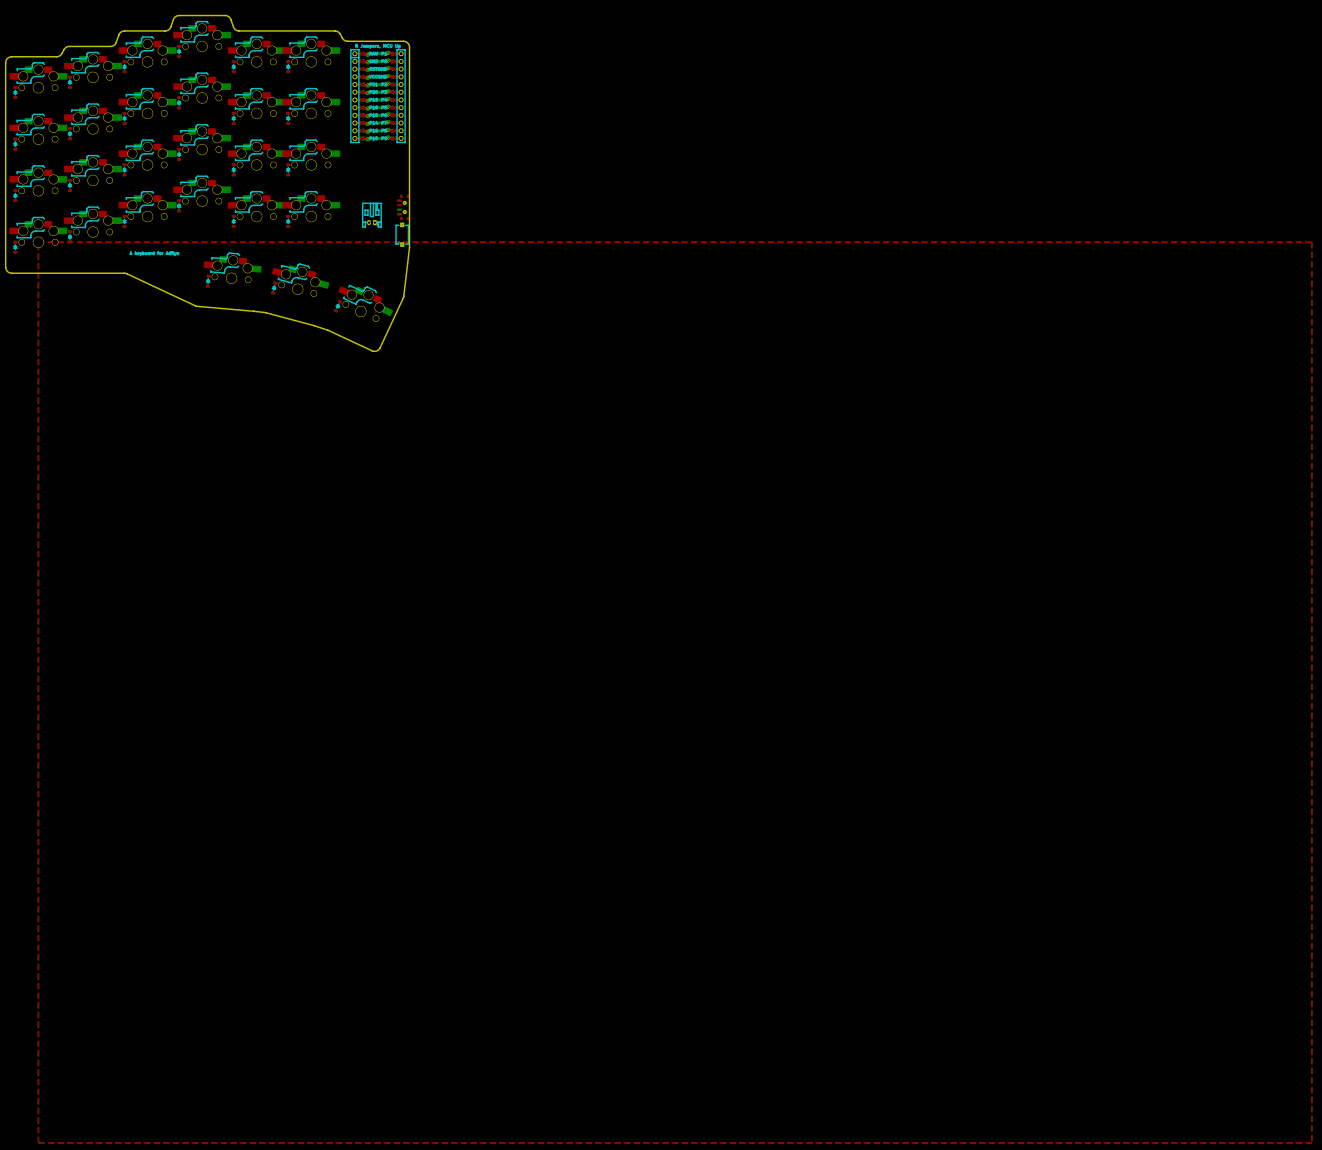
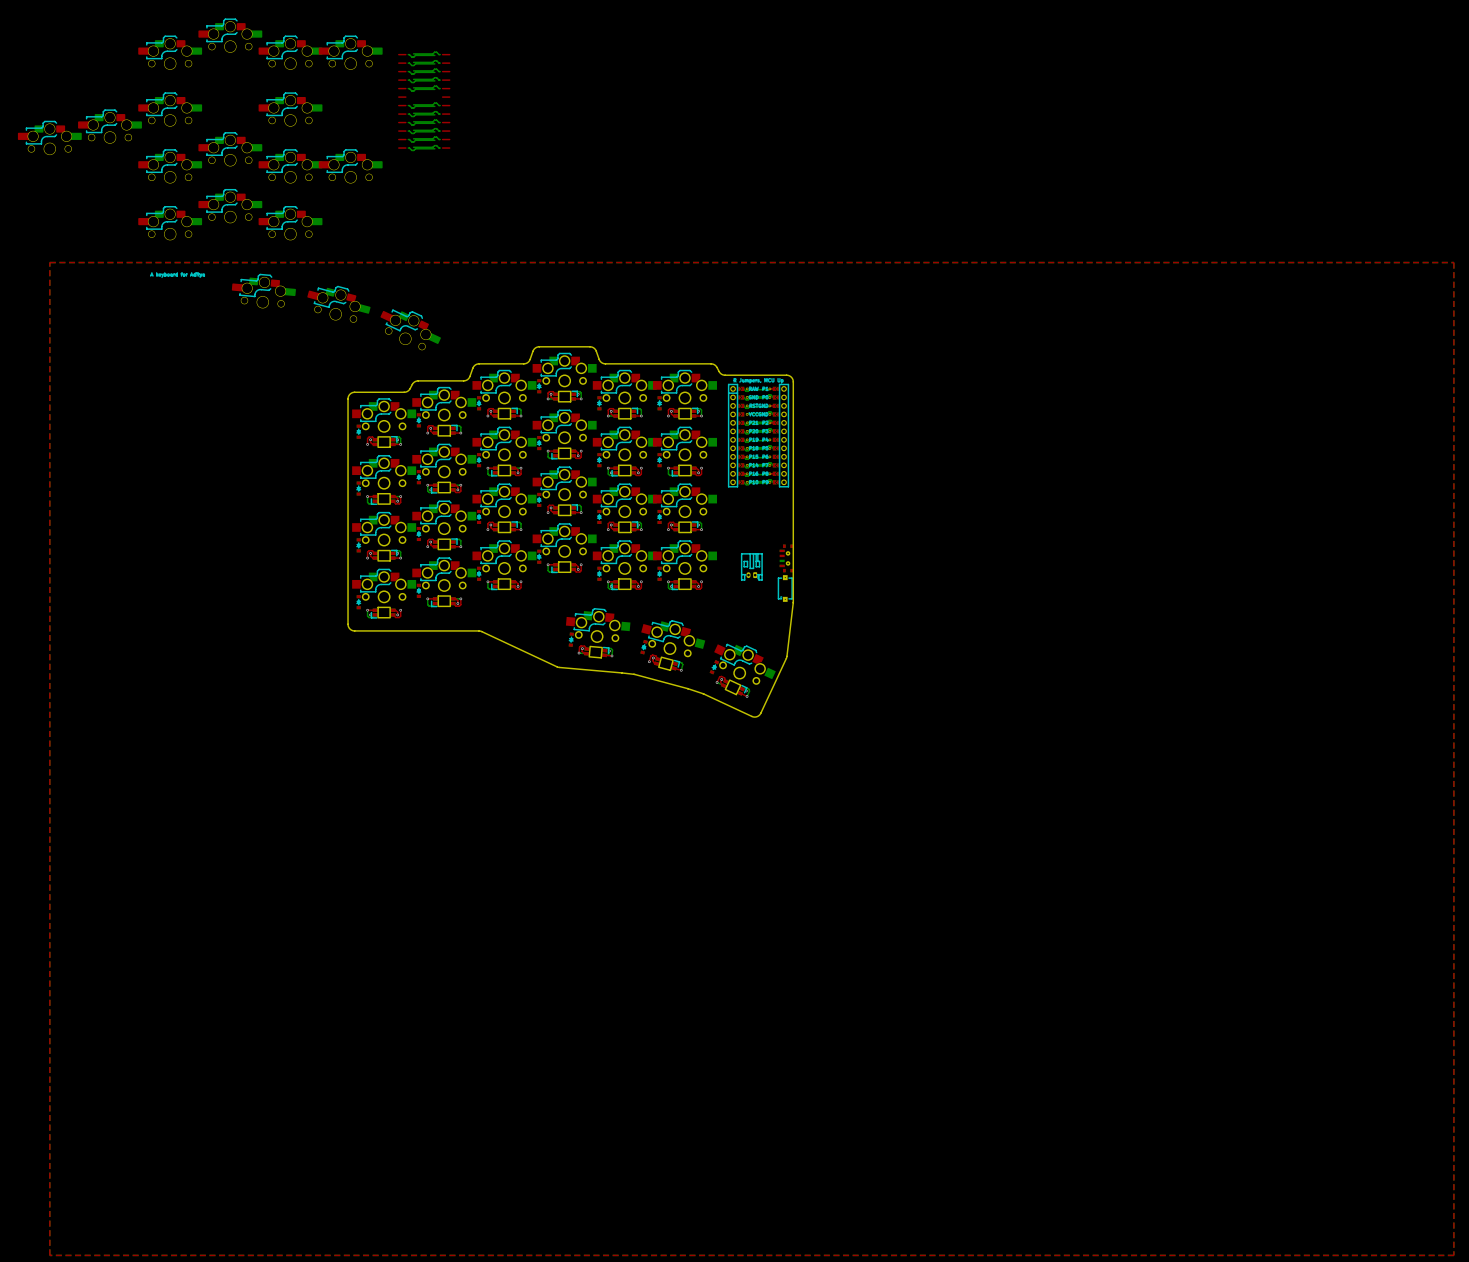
board edge: (179, 15) (226, 15) (230, 18) (234, 28) (238, 30) (335, 31) (346, 41) (403, 41) (408, 44) (409, 247) (403, 297) (377, 350) (372, 350) (327, 330) (265, 312) (196, 306) (125, 273) (11, 273) (6, 270) (6, 59) (11, 56) (57, 56) (68, 46) (112, 46) (122, 31) (166, 30) (170, 28) (174, 17) (179, 15) -> none
part: (179, 51) -> none
top track: (363, 53) (367, 53) -> none
top track: (388, 53) (392, 53) -> none
top track: (363, 61) (367, 61) -> none
top track: (388, 61) (392, 61) -> none
part: (124, 66) -> none
part: (233, 66) -> none
part: (288, 66) -> none
part: (92, 67) -> none
top track: (363, 69) (367, 69) -> none
top track: (388, 69) (392, 69) -> none
top track: (363, 76) (367, 76) -> none
top track: (388, 76) (392, 76) -> none
part: (38, 77) -> none
part: (69, 82) -> none
top track: (363, 84) (367, 84) -> none
top track: (388, 84) (392, 84) -> none
part: (202, 88) -> none
bottom track: (368, 91) (389, 90) (392, 92) -> none
part: (15, 92) -> none
top track: (363, 92) (367, 92) -> none
bottom track: (363, 92) (366, 94) (387, 92) -> none
top track: (388, 92) (392, 92) -> none
part: (377, 96) -> none
top track: (363, 99) (367, 99) -> none
top track: (388, 99) (392, 99) -> none
part: (179, 102) -> none
part: (311, 103) -> none
top track: (363, 107) (367, 107) -> none
top track: (388, 107) (392, 107) -> none
top track: (363, 115) (367, 115) -> none
top track: (388, 115) (392, 115) -> none
part: (124, 118) -> none
part: (233, 118) -> none
part: (288, 118) -> none
top track: (363, 123) (367, 123) -> none
top track: (388, 123) (392, 123) -> none
top track: (363, 130) (367, 130) -> none
top track: (388, 130) (392, 130) -> none
part: (69, 133) -> none
top track: (363, 138) (367, 138) -> none
top track: (388, 138) (392, 138) -> none
part: (15, 144) -> none
part: (179, 154) -> none
part: (124, 169) -> none
part: (233, 169) -> none
part: (288, 169) -> none
part: (92, 170) -> none
part: (38, 181) -> none
part: (69, 185) -> none
part: (15, 195) -> none
part: (179, 205) -> none
part: (311, 206) -> none
part: (403, 207) -> none
part: (371, 215) -> none
part: (124, 221) -> none
part: (233, 221) -> none
part: (288, 221) -> none
part: (92, 222) -> none
part: (38, 232) -> none
part: (402, 234) -> none
part: (69, 236) -> none
part: (15, 247) -> none
part: (208, 281) -> none
part: (274, 287) -> none
part: (337, 306) -> none
board edge: none -> (539, 346) (591, 347) (595, 349) (600, 361) (604, 363) (711, 363) (723, 375) (786, 375) (792, 378) (793, 602) (786, 657) (757, 716) (751, 716) (703, 693) (634, 674) (558, 667) (480, 631) (354, 630) (349, 627) (349, 395) (353, 392) (405, 392) (417, 380) (465, 380) (469, 377) (473, 367) (476, 364) (525, 363) (529, 360) (534, 349) (539, 346)
part: none -> (564, 369)
part: none -> (539, 386)
part: none -> (504, 386)
part: none -> (624, 386)
part: none -> (684, 386)
bottom track: none -> (742, 388) (746, 391) (769, 389)
top track: none -> (769, 388) (774, 388)
top track: none -> (551, 394) (551, 396) (555, 398)
via: none -> (551, 394)
top track: none -> (555, 394) (549, 391) (548, 398)
bottom track: none -> (573, 394) (579, 391) (581, 398)
via: none -> (578, 394)
part: none -> (565, 396)
bottom track: none -> (747, 396) (770, 394) (774, 397)
bottom track: none -> (742, 397) (746, 399) (769, 398)
bottom track: none -> (548, 398) (555, 398)
via: none -> (548, 398)
top track: none -> (573, 398) (581, 398)
via: none -> (581, 398)
part: none -> (479, 403)
part: none -> (599, 403)
part: none -> (659, 403)
part: none -> (444, 404)
bottom track: none -> (742, 405) (746, 408) (769, 406)
top track: none -> (769, 405) (774, 405)
top track: none -> (490, 411) (490, 414) (495, 416)
via: none -> (490, 411)
top track: none -> (495, 411) (489, 408) (487, 416)
bottom track: none -> (513, 411) (519, 408) (521, 416)
top track: none -> (611, 411) (611, 414) (615, 416)
via: none -> (611, 411)
top track: none -> (615, 411) (609, 408) (608, 416)
bottom track: none -> (633, 411) (639, 408) (641, 416)
top track: none -> (671, 411) (671, 414) (675, 416)
via: none -> (671, 411)
top track: none -> (675, 411) (669, 408) (668, 416)
bottom track: none -> (694, 411) (700, 408) (701, 416)
via: none -> (698, 411)
part: none -> (505, 413)
part: none -> (625, 413)
part: none -> (685, 413)
bottom track: none -> (747, 413) (770, 411) (774, 414)
part: none -> (384, 415)
via: none -> (487, 416)
top track: none -> (513, 416) (521, 416)
via: none -> (521, 416)
bottom track: none -> (608, 416) (615, 416)
via: none -> (608, 416)
top track: none -> (633, 416) (641, 416)
via: none -> (641, 416)
via: none -> (668, 416)
top track: none -> (694, 416) (701, 416)
via: none -> (701, 416)
part: none -> (418, 420)
bottom track: none -> (742, 422) (746, 425) (769, 423)
bottom track: none -> (747, 422) (770, 420) (774, 422)
top track: none -> (769, 422) (774, 422)
part: none -> (564, 426)
top track: none -> (430, 428) (430, 431) (435, 433)
via: none -> (430, 428)
top track: none -> (435, 428) (429, 425) (427, 433)
bottom track: none -> (453, 428) (459, 425) (460, 433)
part: none -> (445, 430)
bottom track: none -> (747, 430) (770, 428) (774, 431)
part: none -> (358, 431)
bottom track: none -> (742, 431) (746, 433) (769, 432)
via: none -> (427, 433)
top track: none -> (453, 433) (460, 433)
via: none -> (460, 433)
part: none -> (758, 435)
top track: none -> (370, 439) (370, 442) (375, 444)
via: none -> (370, 439)
top track: none -> (375, 439) (368, 437) (367, 444)
bottom track: none -> (393, 439) (399, 437) (400, 444)
bottom track: none -> (397, 439) (397, 442) (393, 444)
via: none -> (397, 439)
bottom track: none -> (742, 439) (746, 442) (769, 440)
part: none -> (384, 441)
part: none -> (504, 443)
part: none -> (539, 443)
part: none -> (624, 443)
part: none -> (684, 443)
via: none -> (367, 444)
top track: none -> (393, 444) (400, 444)
via: none -> (400, 444)
bottom track: none -> (742, 448) (746, 450) (769, 449)
bottom track: none -> (747, 447) (770, 445) (774, 448)
top track: none -> (548, 451) (555, 451)
bottom track: none -> (548, 451) (549, 458) (555, 455)
via: none -> (548, 451)
top track: none -> (573, 451) (578, 453) (578, 455)
top track: none -> (581, 451) (579, 458) (573, 455)
via: none -> (581, 451)
part: none -> (563, 453)
via: none -> (578, 455)
top track: none -> (742, 456) (747, 456)
bottom track: none -> (742, 456) (746, 459) (769, 457)
part: none -> (479, 460)
part: none -> (599, 460)
part: none -> (659, 460)
part: none -> (444, 460)
bottom track: none -> (747, 464) (770, 462) (774, 465)
bottom track: none -> (742, 465) (746, 467) (769, 466)
top track: none -> (487, 468) (495, 468)
bottom track: none -> (487, 468) (489, 475) (495, 472)
via: none -> (487, 468)
top track: none -> (513, 468) (518, 470) (518, 472)
bottom track: none -> (513, 468) (521, 468)
top track: none -> (521, 468) (519, 475) (513, 472)
via: none -> (521, 468)
top track: none -> (608, 468) (615, 468)
bottom track: none -> (608, 468) (609, 475) (615, 472)
via: none -> (608, 468)
top track: none -> (633, 468) (638, 470) (638, 472)
top track: none -> (641, 468) (639, 475) (633, 472)
via: none -> (641, 468)
top track: none -> (668, 468) (675, 468)
bottom track: none -> (668, 468) (669, 475) (675, 472)
via: none -> (668, 468)
top track: none -> (694, 468) (698, 470) (698, 472)
top track: none -> (701, 468) (700, 475) (694, 472)
via: none -> (701, 468)
part: none -> (503, 470)
part: none -> (624, 470)
part: none -> (684, 470)
part: none -> (384, 472)
via: none -> (518, 472)
via: none -> (611, 472)
via: none -> (638, 472)
via: none -> (698, 472)
top track: none -> (742, 473) (747, 473)
bottom track: none -> (742, 473) (746, 476) (769, 474)
top track: none -> (769, 473) (774, 473)
part: none -> (418, 477)
bottom track: none -> (747, 481) (770, 479) (774, 482)
bottom track: none -> (742, 482) (746, 484) (769, 483)
part: none -> (564, 483)
top track: none -> (427, 485) (435, 485)
bottom track: none -> (427, 485) (429, 492) (435, 489)
via: none -> (427, 485)
top track: none -> (453, 485) (457, 487) (457, 489)
bottom track: none -> (453, 485) (460, 485)
top track: none -> (460, 485) (459, 492) (453, 489)
via: none -> (460, 485)
part: none -> (443, 487)
part: none -> (358, 488)
via: none -> (430, 489)
via: none -> (457, 489)
top track: none -> (367, 496) (375, 496)
bottom track: none -> (367, 496) (368, 503) (375, 501)
via: none -> (367, 496)
top track: none -> (393, 496) (397, 498) (397, 501)
bottom track: none -> (393, 496) (400, 496)
top track: none -> (400, 496) (399, 503) (393, 501)
via: none -> (400, 496)
part: none -> (383, 498)
part: none -> (539, 499)
via: none -> (397, 501)
part: none -> (504, 500)
part: none -> (624, 500)
part: none -> (684, 500)
top track: none -> (551, 507) (551, 510) (555, 512)
via: none -> (551, 507)
top track: none -> (555, 507) (549, 505) (548, 512)
bottom track: none -> (573, 507) (579, 505) (581, 512)
part: none -> (565, 510)
via: none -> (548, 512)
top track: none -> (573, 512) (581, 512)
via: none -> (581, 512)
part: none -> (444, 517)
part: none -> (479, 516)
part: none -> (599, 516)
part: none -> (659, 516)
top track: none -> (490, 524) (490, 527) (495, 529)
via: none -> (490, 524)
top track: none -> (495, 524) (489, 522) (487, 529)
bottom track: none -> (513, 524) (519, 522) (521, 529)
top track: none -> (611, 524) (611, 527) (615, 529)
via: none -> (611, 524)
top track: none -> (615, 524) (609, 522) (608, 529)
bottom track: none -> (633, 524) (639, 522) (641, 529)
bottom track: none -> (638, 524) (638, 527) (633, 529)
via: none -> (638, 524)
top track: none -> (671, 524) (671, 527) (675, 529)
via: none -> (671, 524)
top track: none -> (675, 524) (669, 522) (668, 529)
bottom track: none -> (694, 524) (700, 522) (701, 529)
via: none -> (698, 524)
part: none -> (505, 527)
part: none -> (625, 527)
part: none -> (685, 527)
part: none -> (384, 529)
via: none -> (487, 529)
top track: none -> (513, 529) (521, 529)
via: none -> (521, 529)
via: none -> (608, 529)
top track: none -> (633, 529) (641, 529)
via: none -> (641, 529)
via: none -> (668, 529)
top track: none -> (694, 529) (701, 529)
via: none -> (701, 529)
part: none -> (418, 534)
part: none -> (564, 540)
top track: none -> (430, 542) (430, 544) (435, 546)
via: none -> (430, 542)
top track: none -> (435, 542) (429, 539) (427, 546)
bottom track: none -> (453, 542) (459, 539) (460, 546)
part: none -> (445, 544)
part: none -> (358, 545)
via: none -> (427, 546)
top track: none -> (453, 546) (460, 546)
via: none -> (460, 546)
top track: none -> (370, 553) (370, 556) (375, 558)
via: none -> (370, 553)
top track: none -> (375, 553) (368, 550) (367, 558)
bottom track: none -> (393, 553) (399, 550) (400, 558)
via: none -> (397, 553)
part: none -> (384, 555)
part: none -> (504, 557)
part: none -> (539, 556)
part: none -> (624, 557)
part: none -> (684, 557)
via: none -> (367, 558)
top track: none -> (393, 558) (400, 558)
via: none -> (400, 558)
part: none -> (786, 558)
top track: none -> (548, 564) (555, 564)
bottom track: none -> (548, 564) (549, 572) (555, 569)
via: none -> (548, 564)
top track: none -> (573, 564) (578, 566) (578, 569)
top track: none -> (581, 564) (579, 572) (573, 569)
via: none -> (581, 564)
part: none -> (563, 567)
part: none -> (751, 566)
via: none -> (578, 569)
part: none -> (479, 573)
part: none -> (599, 573)
part: none -> (659, 573)
part: none -> (444, 574)
top track: none -> (487, 581) (495, 581)
bottom track: none -> (487, 581) (489, 589) (495, 586)
via: none -> (487, 581)
top track: none -> (513, 581) (518, 583) (518, 586)
top track: none -> (521, 581) (519, 589) (513, 586)
via: none -> (521, 581)
top track: none -> (608, 581) (615, 581)
bottom track: none -> (608, 581) (609, 589) (615, 586)
via: none -> (608, 581)
bottom track: none -> (615, 581) (611, 583) (611, 586)
top track: none -> (633, 581) (638, 583) (638, 586)
top track: none -> (641, 581) (639, 589) (633, 586)
via: none -> (641, 581)
top track: none -> (668, 581) (675, 581)
bottom track: none -> (668, 581) (669, 589) (675, 586)
via: none -> (668, 581)
top track: none -> (694, 581) (698, 583) (698, 586)
top track: none -> (701, 581) (700, 589) (694, 586)
via: none -> (701, 581)
part: none -> (503, 584)
part: none -> (624, 584)
part: none -> (684, 584)
part: none -> (384, 585)
via: none -> (518, 586)
via: none -> (611, 586)
via: none -> (638, 586)
via: none -> (671, 586)
via: none -> (698, 586)
part: none -> (785, 588)
part: none -> (418, 590)
top track: none -> (427, 598) (435, 598)
bottom track: none -> (427, 598) (429, 606) (435, 603)
via: none -> (427, 598)
top track: none -> (453, 598) (457, 600) (457, 603)
bottom track: none -> (453, 598) (460, 598)
top track: none -> (460, 598) (459, 606) (453, 603)
via: none -> (460, 598)
part: none -> (443, 601)
part: none -> (358, 602)
via: none -> (457, 603)
top track: none -> (367, 610) (375, 610)
bottom track: none -> (367, 610) (368, 617) (375, 614)
via: none -> (367, 610)
top track: none -> (393, 610) (397, 612) (397, 614)
top track: none -> (400, 610) (399, 617) (393, 614)
via: none -> (400, 610)
part: none -> (383, 612)
via: none -> (370, 614)
via: none -> (397, 614)
part: none -> (598, 625)
part: none -> (673, 638)
part: none -> (571, 639)
part: none -> (644, 647)
top track: none -> (582, 648) (582, 651) (586, 653)
via: none -> (582, 648)
top track: none -> (586, 649) (581, 645) (579, 653)
bottom track: none -> (604, 650) (611, 648) (612, 655)
bottom track: none -> (609, 651) (609, 653) (604, 655)
via: none -> (609, 651)
part: none -> (596, 652)
bottom track: none -> (579, 653) (586, 653)
via: none -> (579, 653)
top track: none -> (604, 655) (612, 655)
via: none -> (612, 655)
top track: none -> (653, 657) (652, 660) (656, 663)
via: none -> (653, 657)
top track: none -> (657, 659) (652, 655) (649, 661)
via: none -> (649, 661)
part: none -> (666, 663)
bottom track: none -> (675, 663) (681, 662) (681, 670)
part: none -> (744, 664)
part: none -> (714, 667)
top track: none -> (674, 668) (681, 670)
via: none -> (681, 670)
top track: none -> (721, 679) (720, 681) (723, 685)
via: none -> (721, 679)
top track: none -> (725, 681) (721, 676) (717, 682)
bottom track: none -> (717, 682) (723, 685)
via: none -> (717, 682)
part: none -> (734, 687)
bottom track: none -> (742, 689) (748, 689) (747, 696)
via: none -> (746, 690)
top track: none -> (740, 693) (747, 696)
via: none -> (747, 696)

